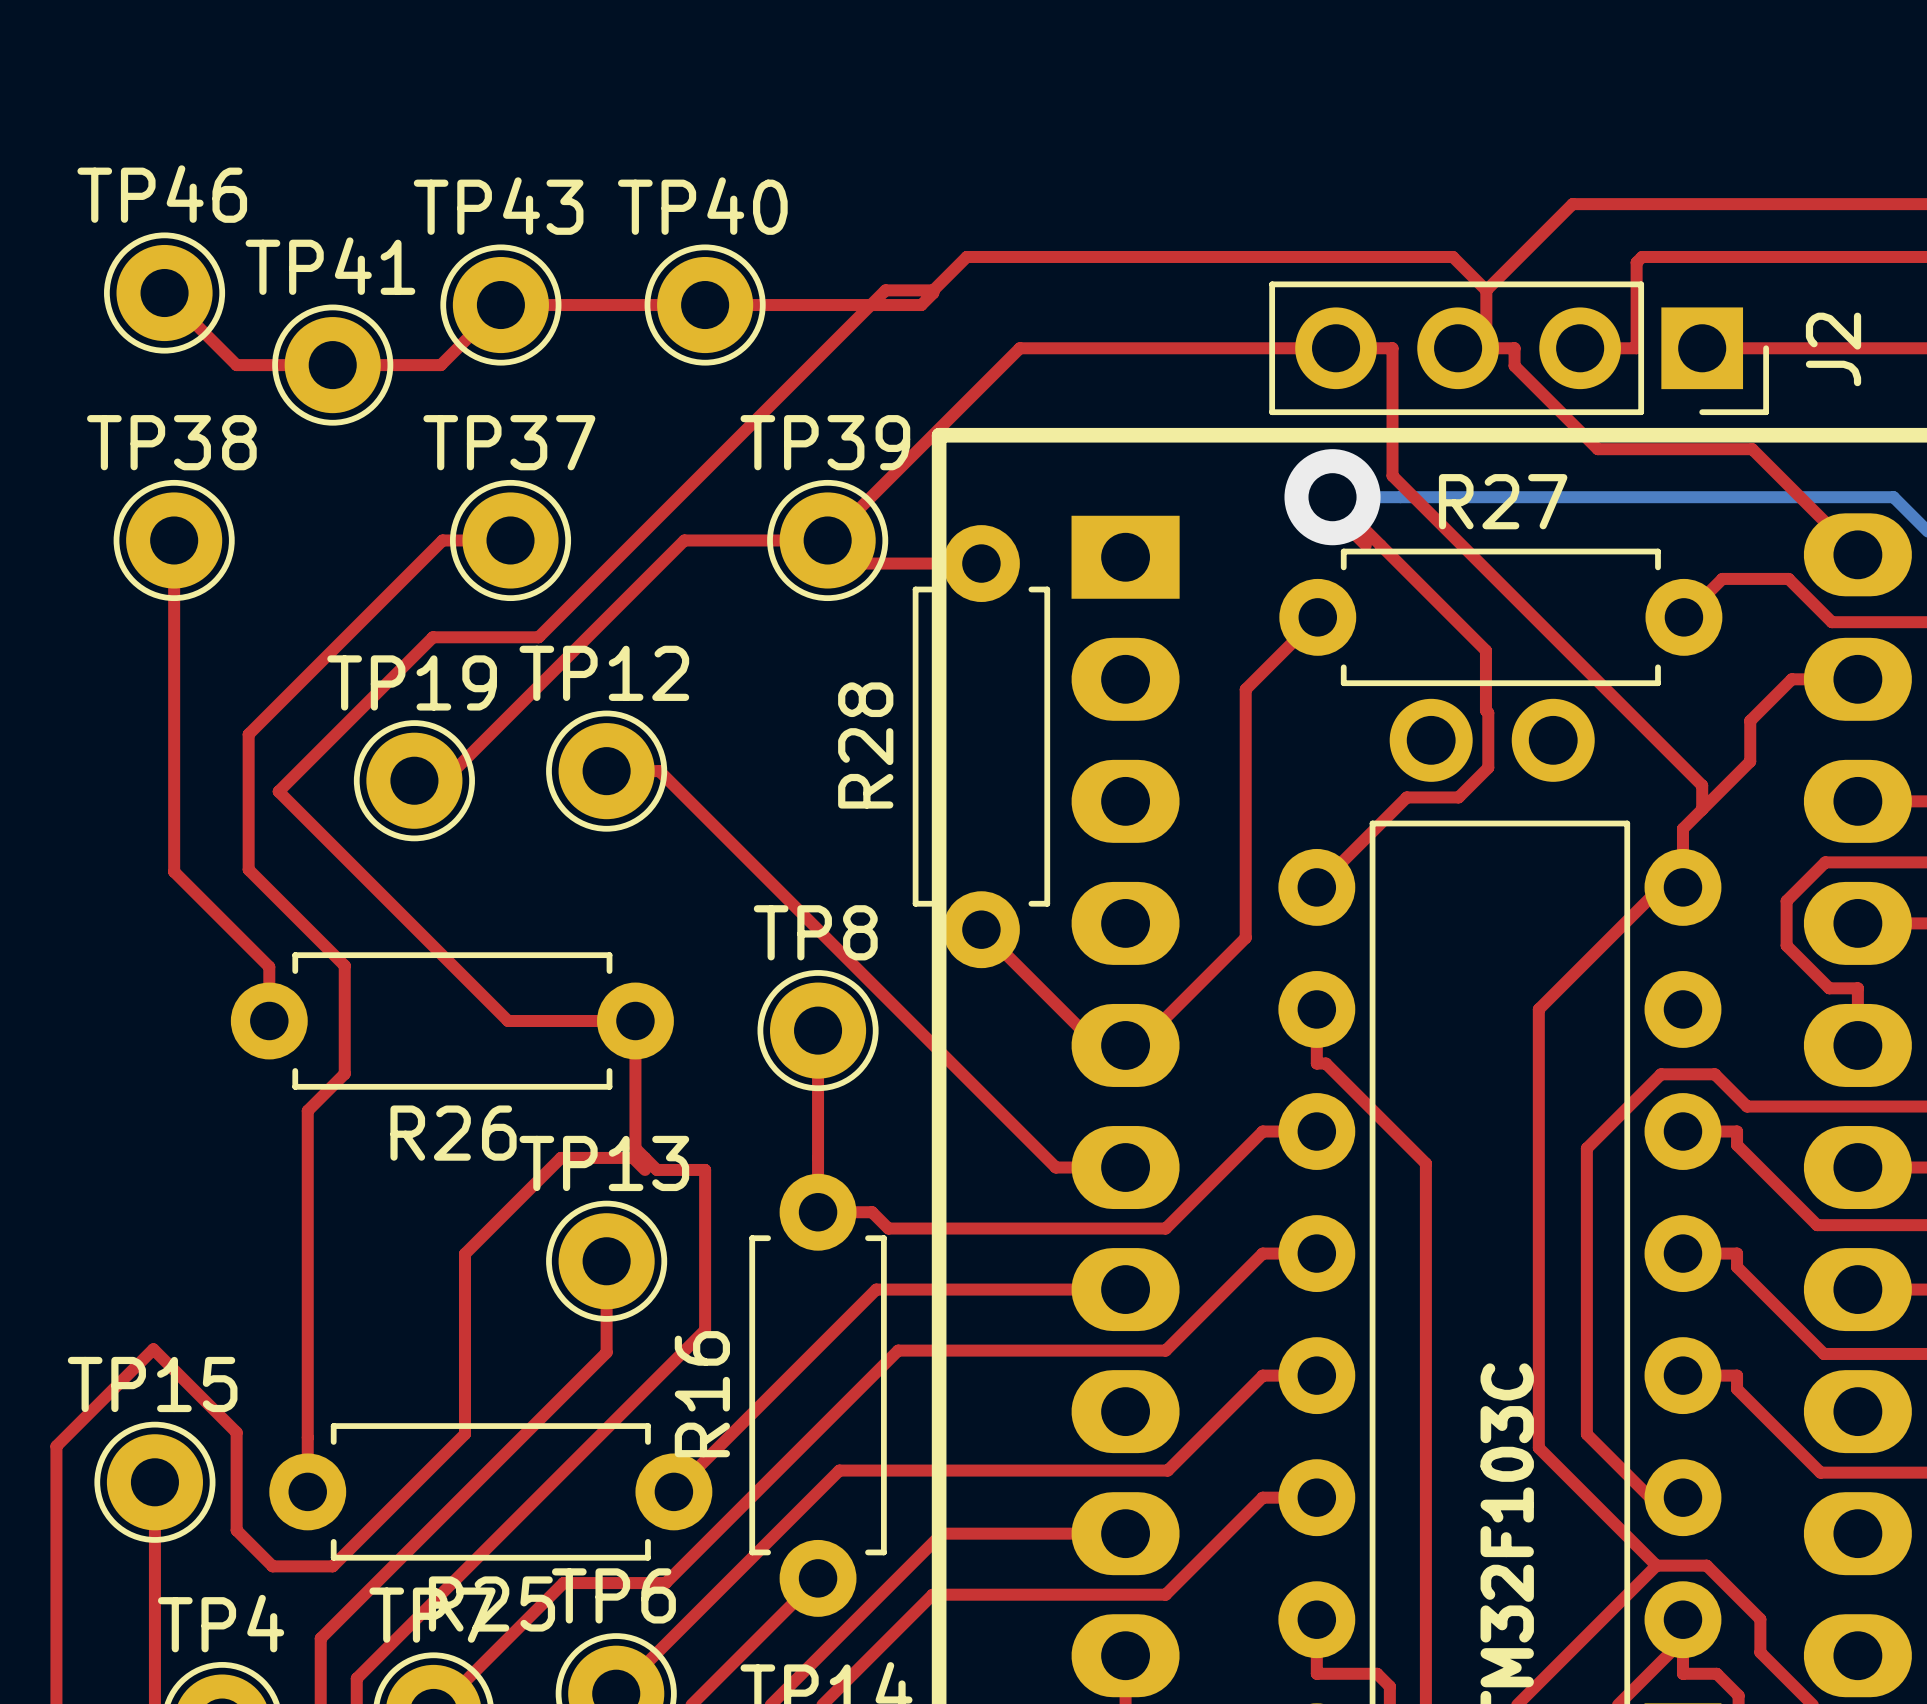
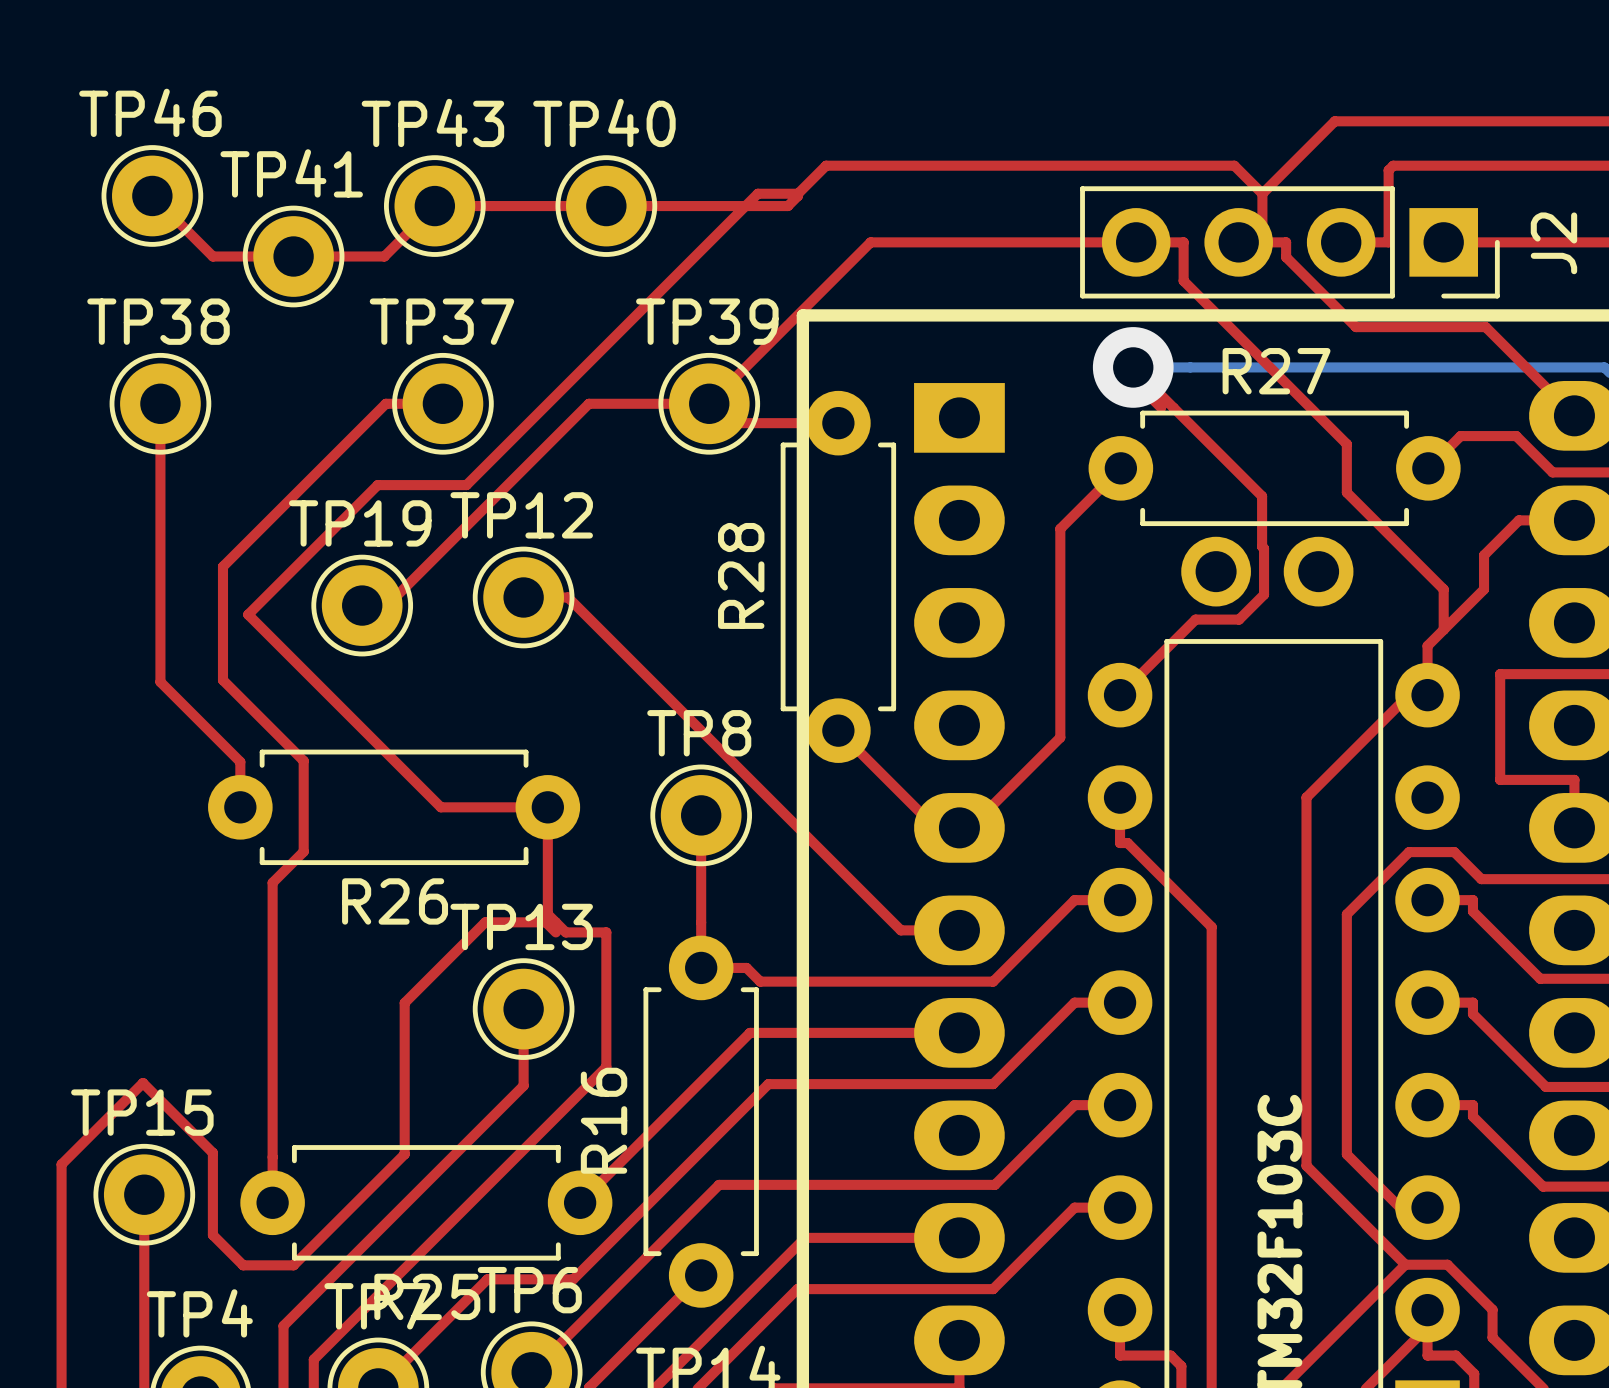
top track: (1392, 394) (1392, 475) (1702, 785) -> (1183, 280) (1346, 444) (1346, 492) (1443, 589) (1443, 609)
top track: (1825, 862) (1786, 901) (1786, 945) (1829, 988) -> (1547, 674) (1500, 674) (1500, 779) (1550, 779)

